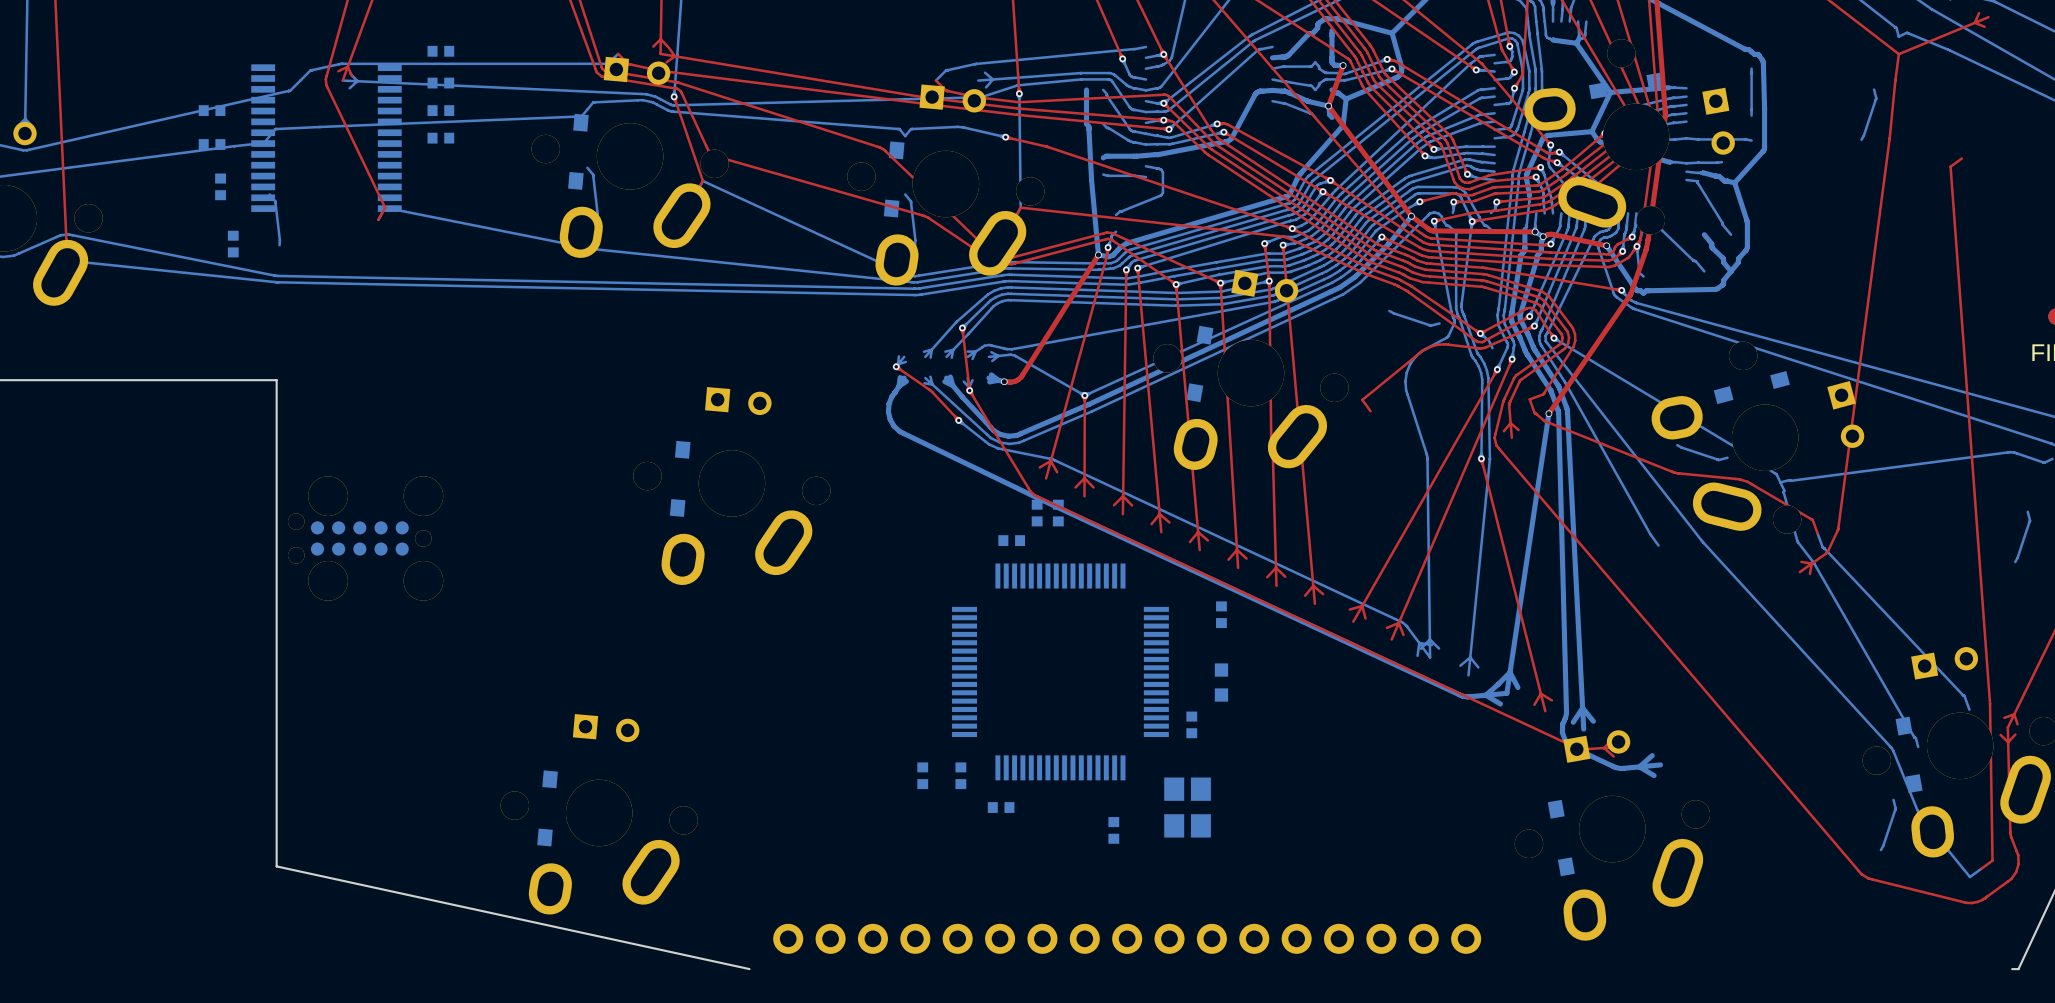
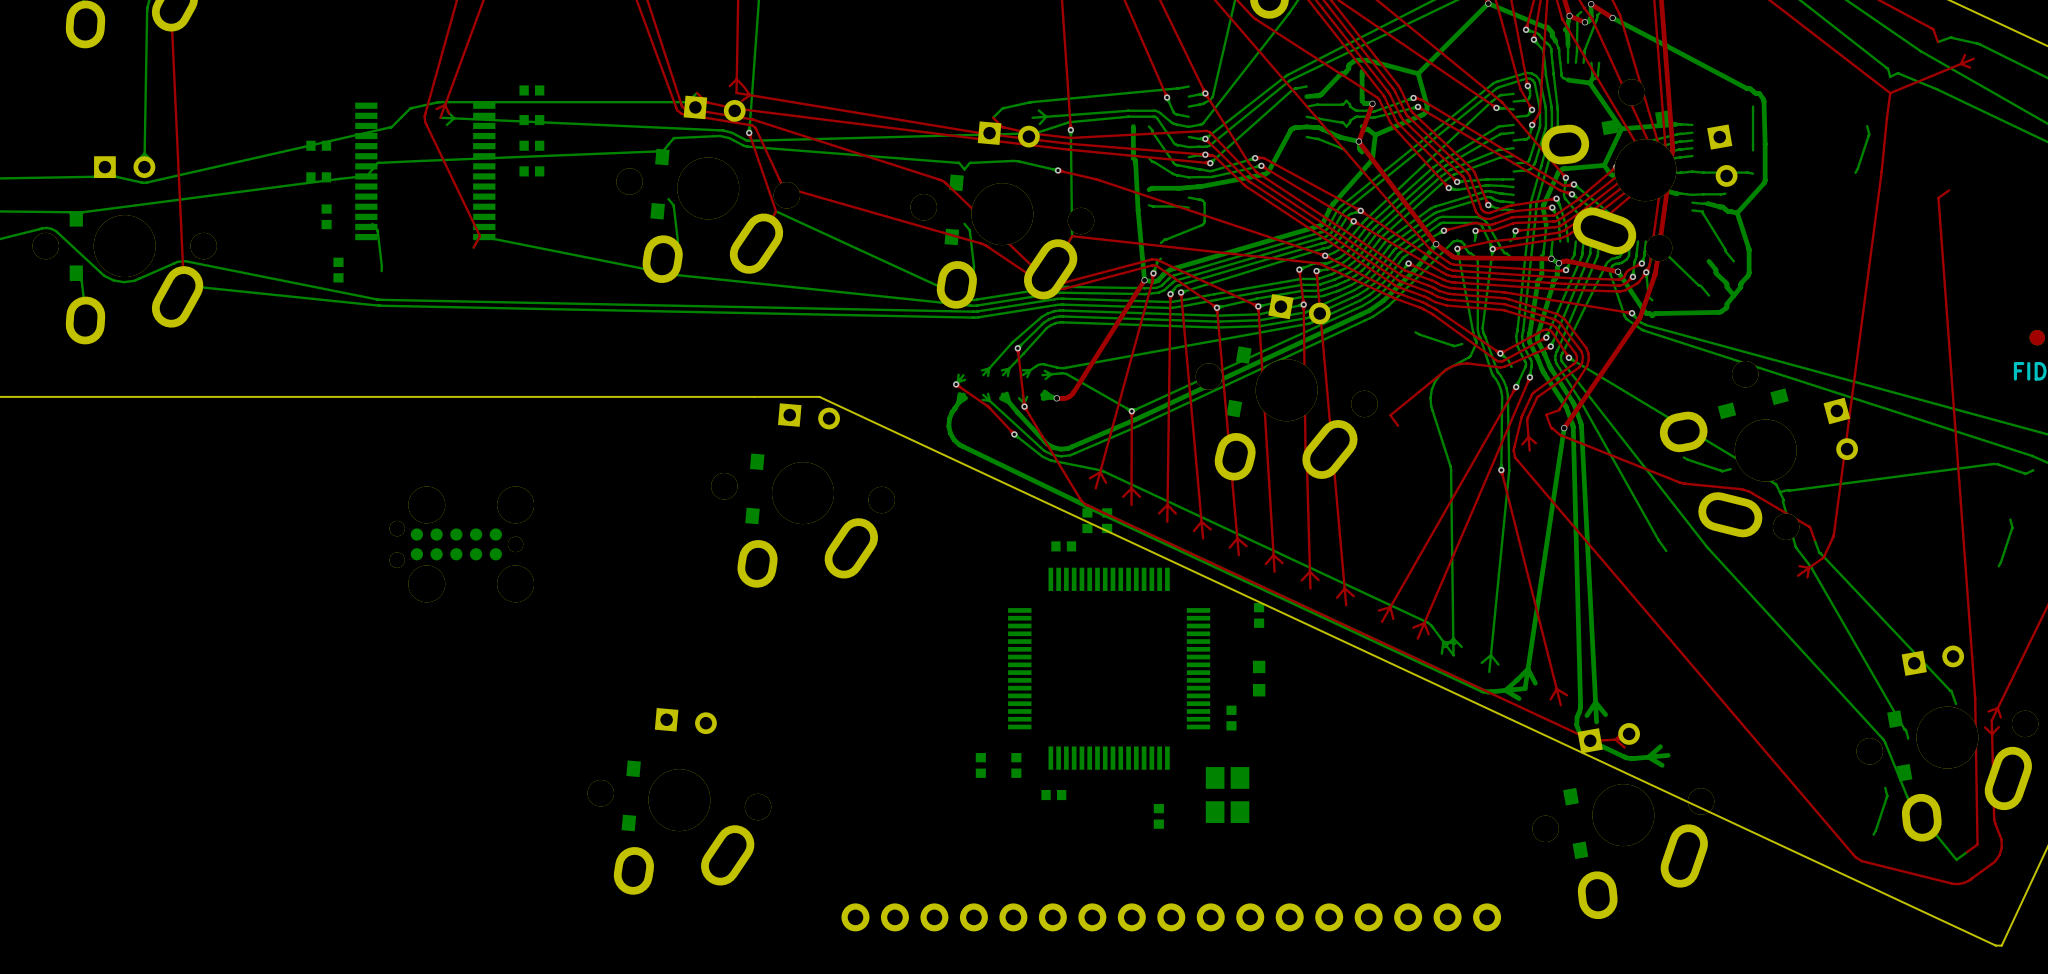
board edge: (276, 380) (276, 866) (749, 969) -> (378, 396) (819, 396) (1995, 945)

